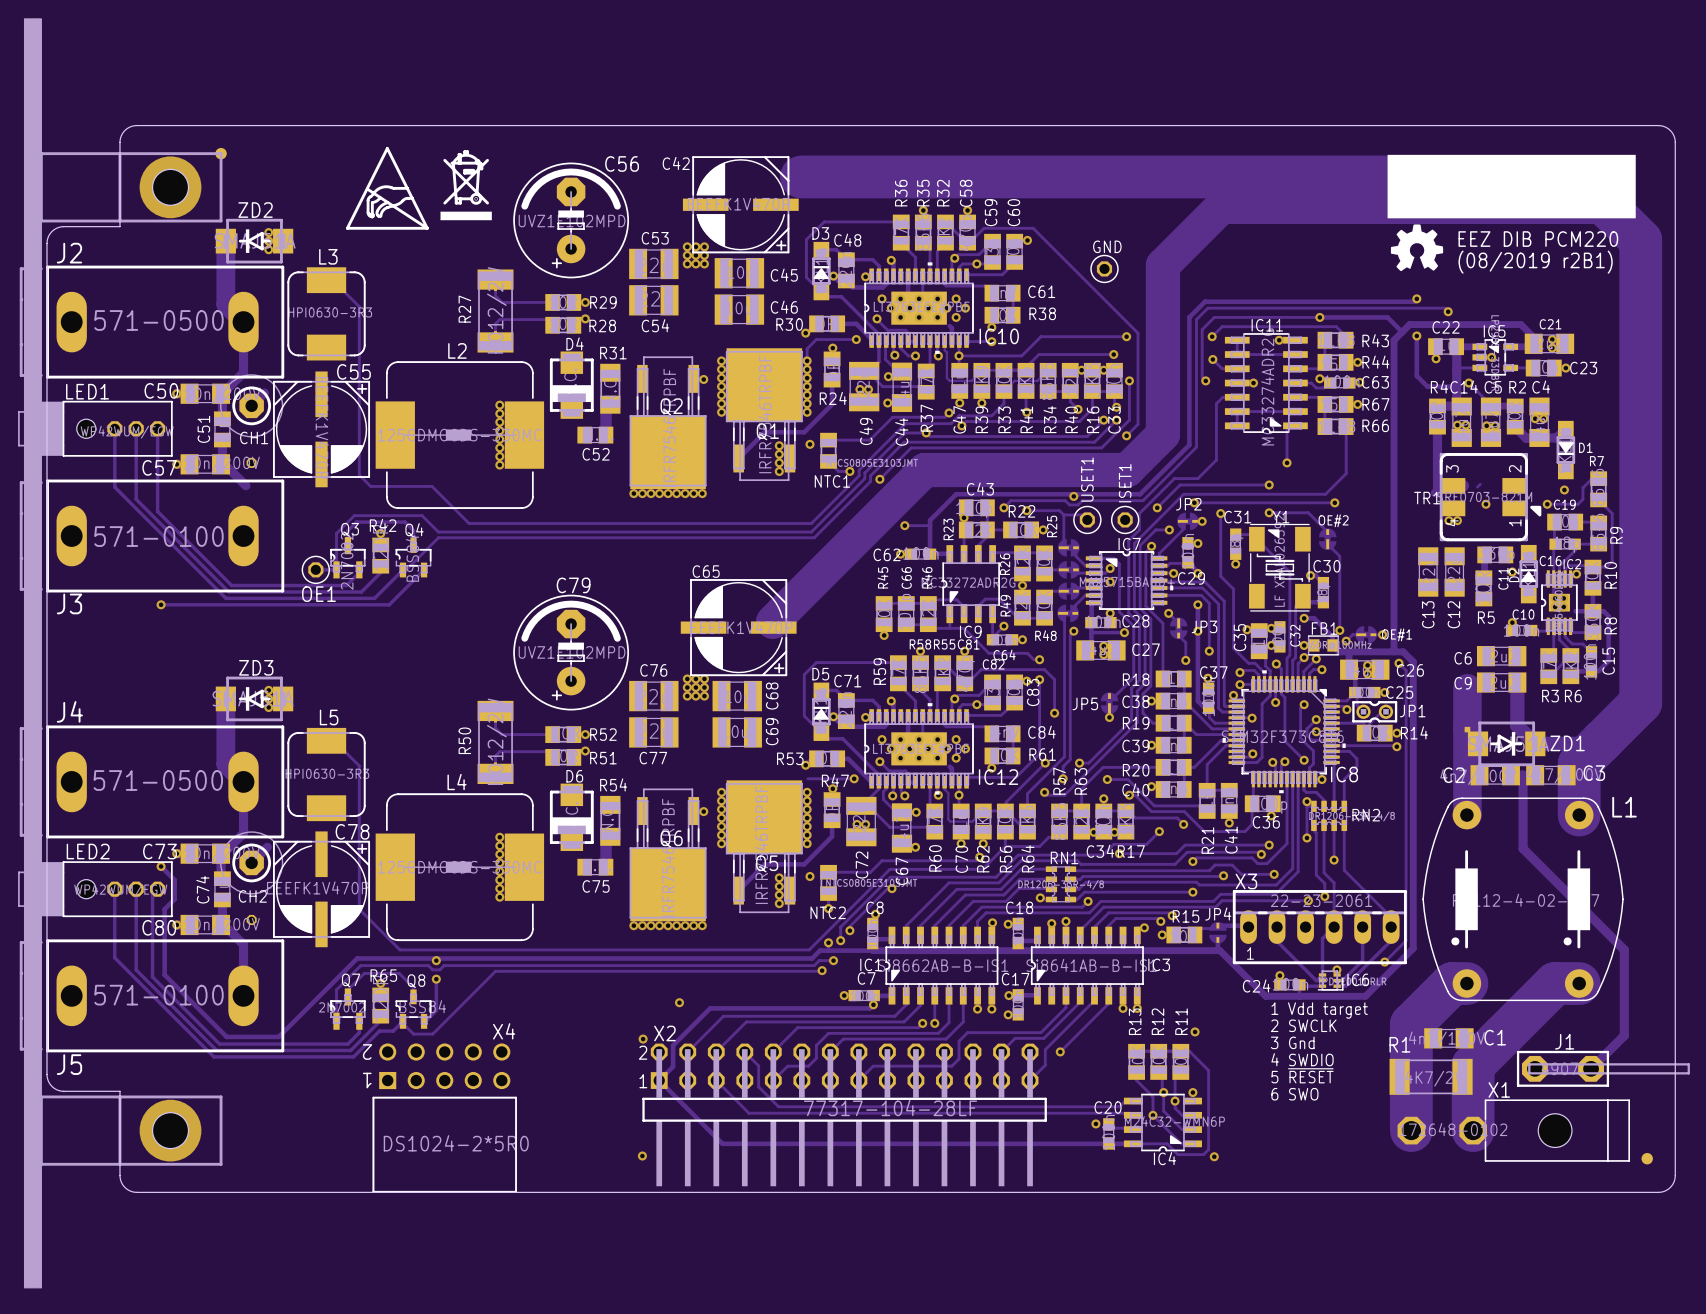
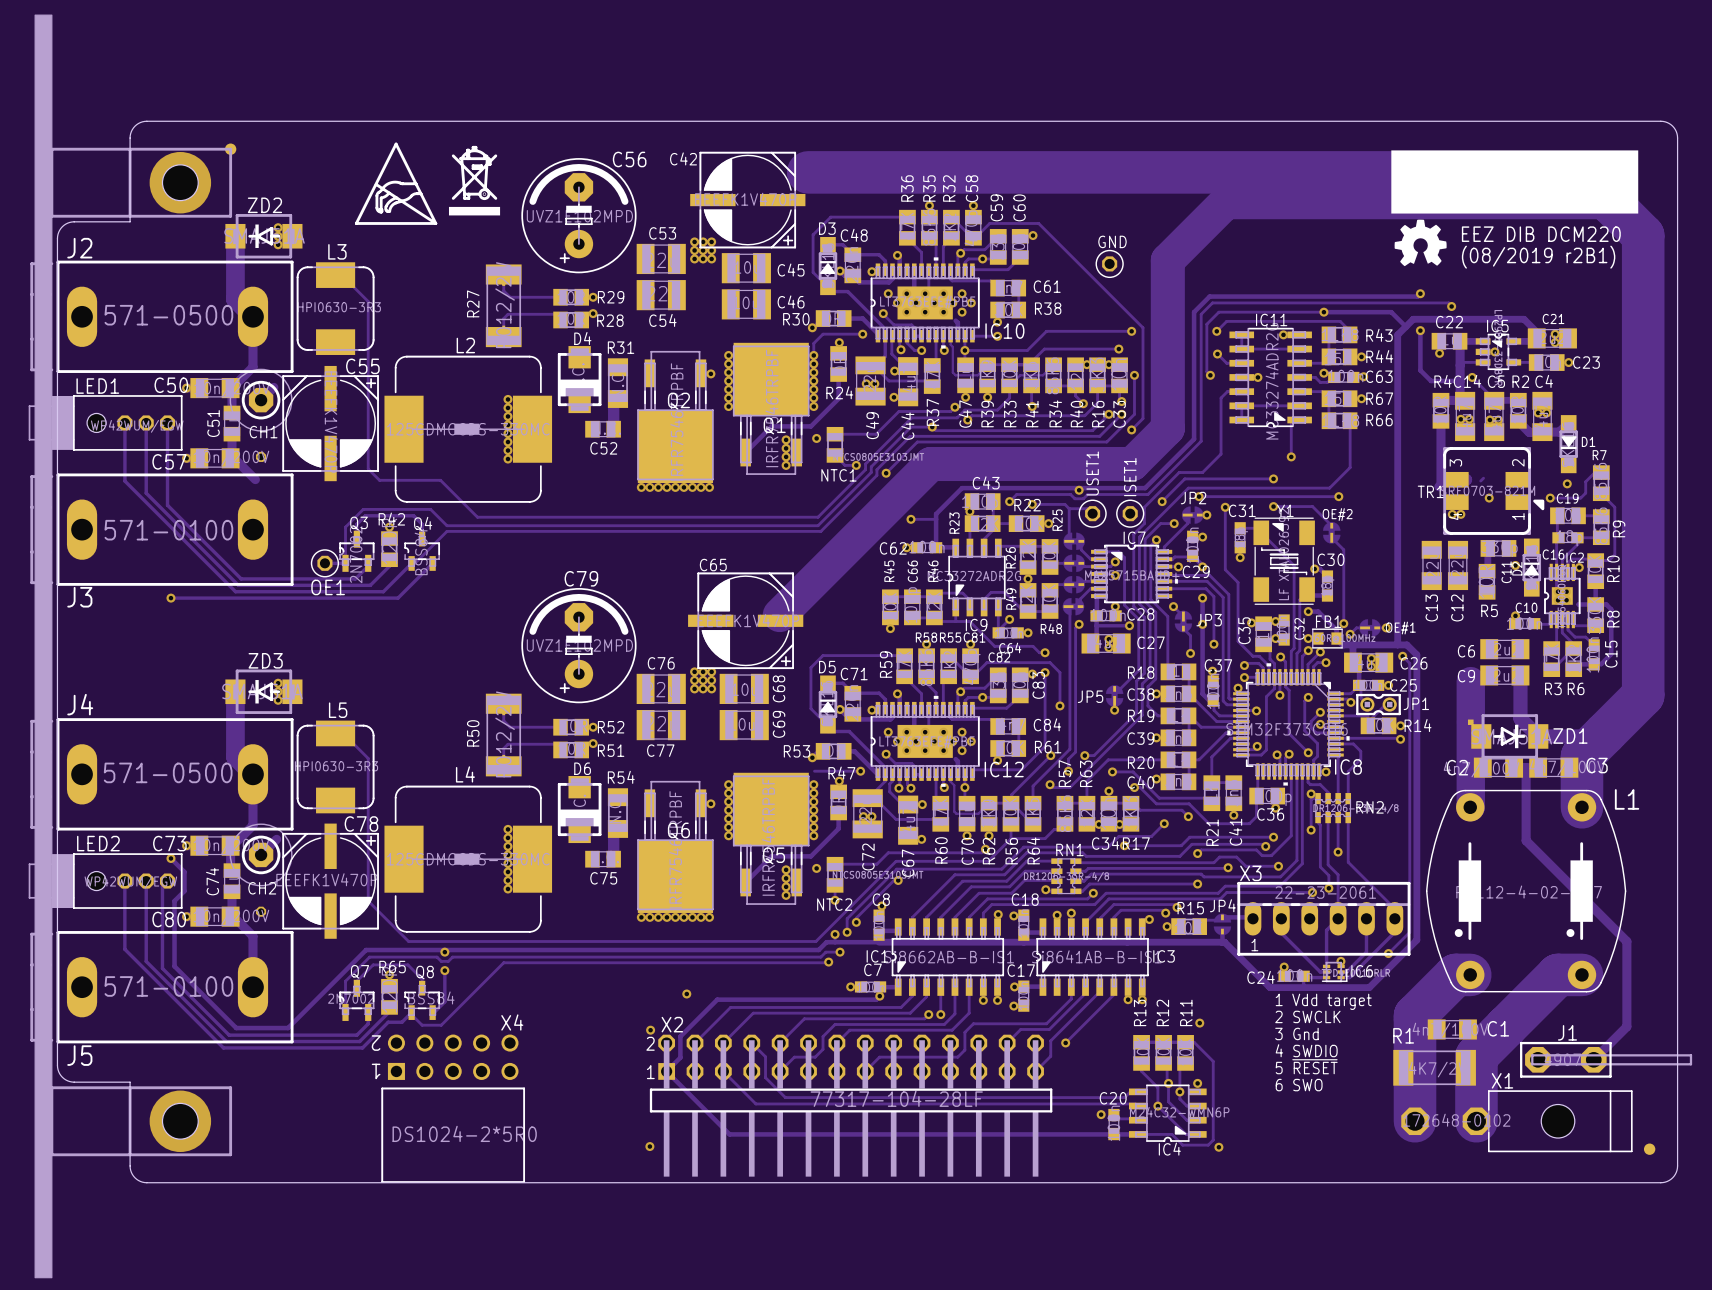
text: EEZ DIB PCM220 (1538, 239) -> EEZ DIB DCM220 (1541, 234)

